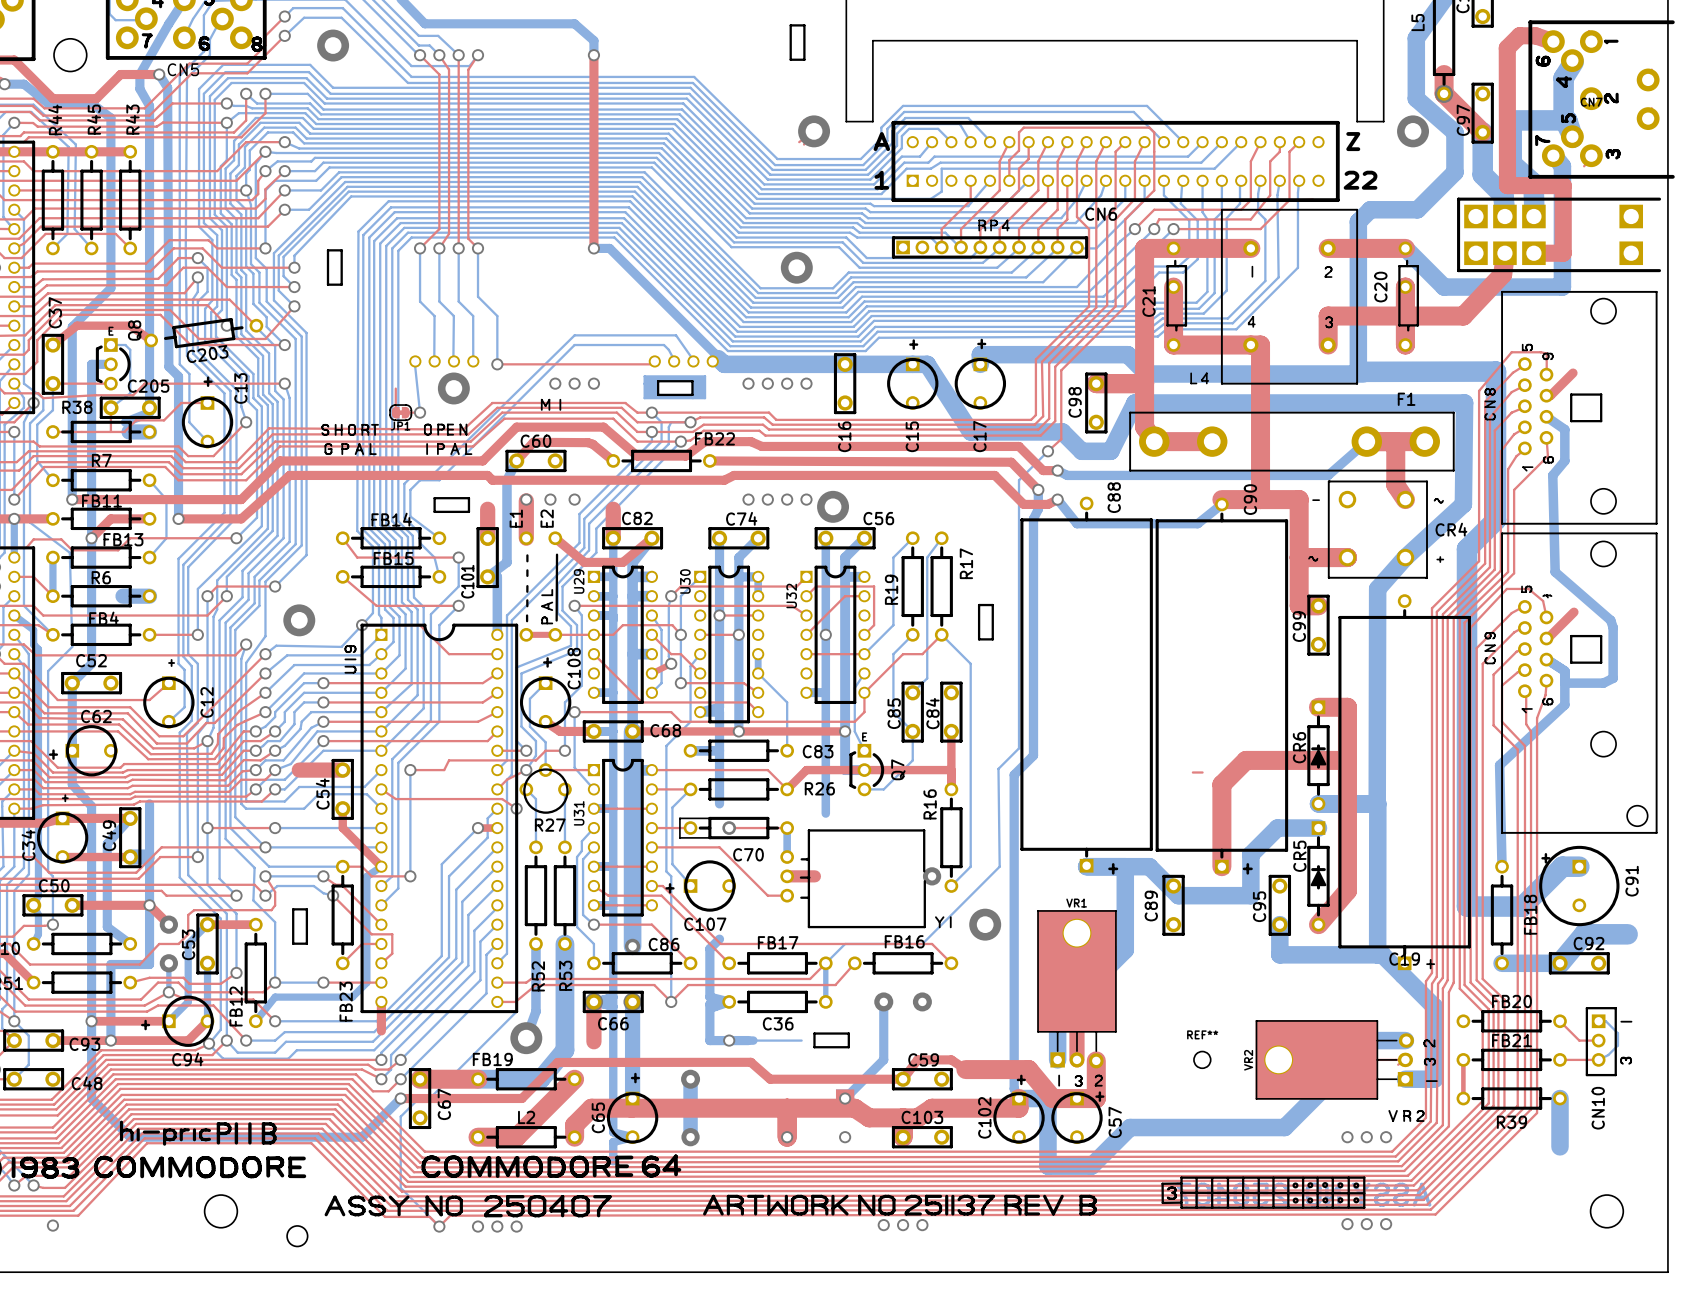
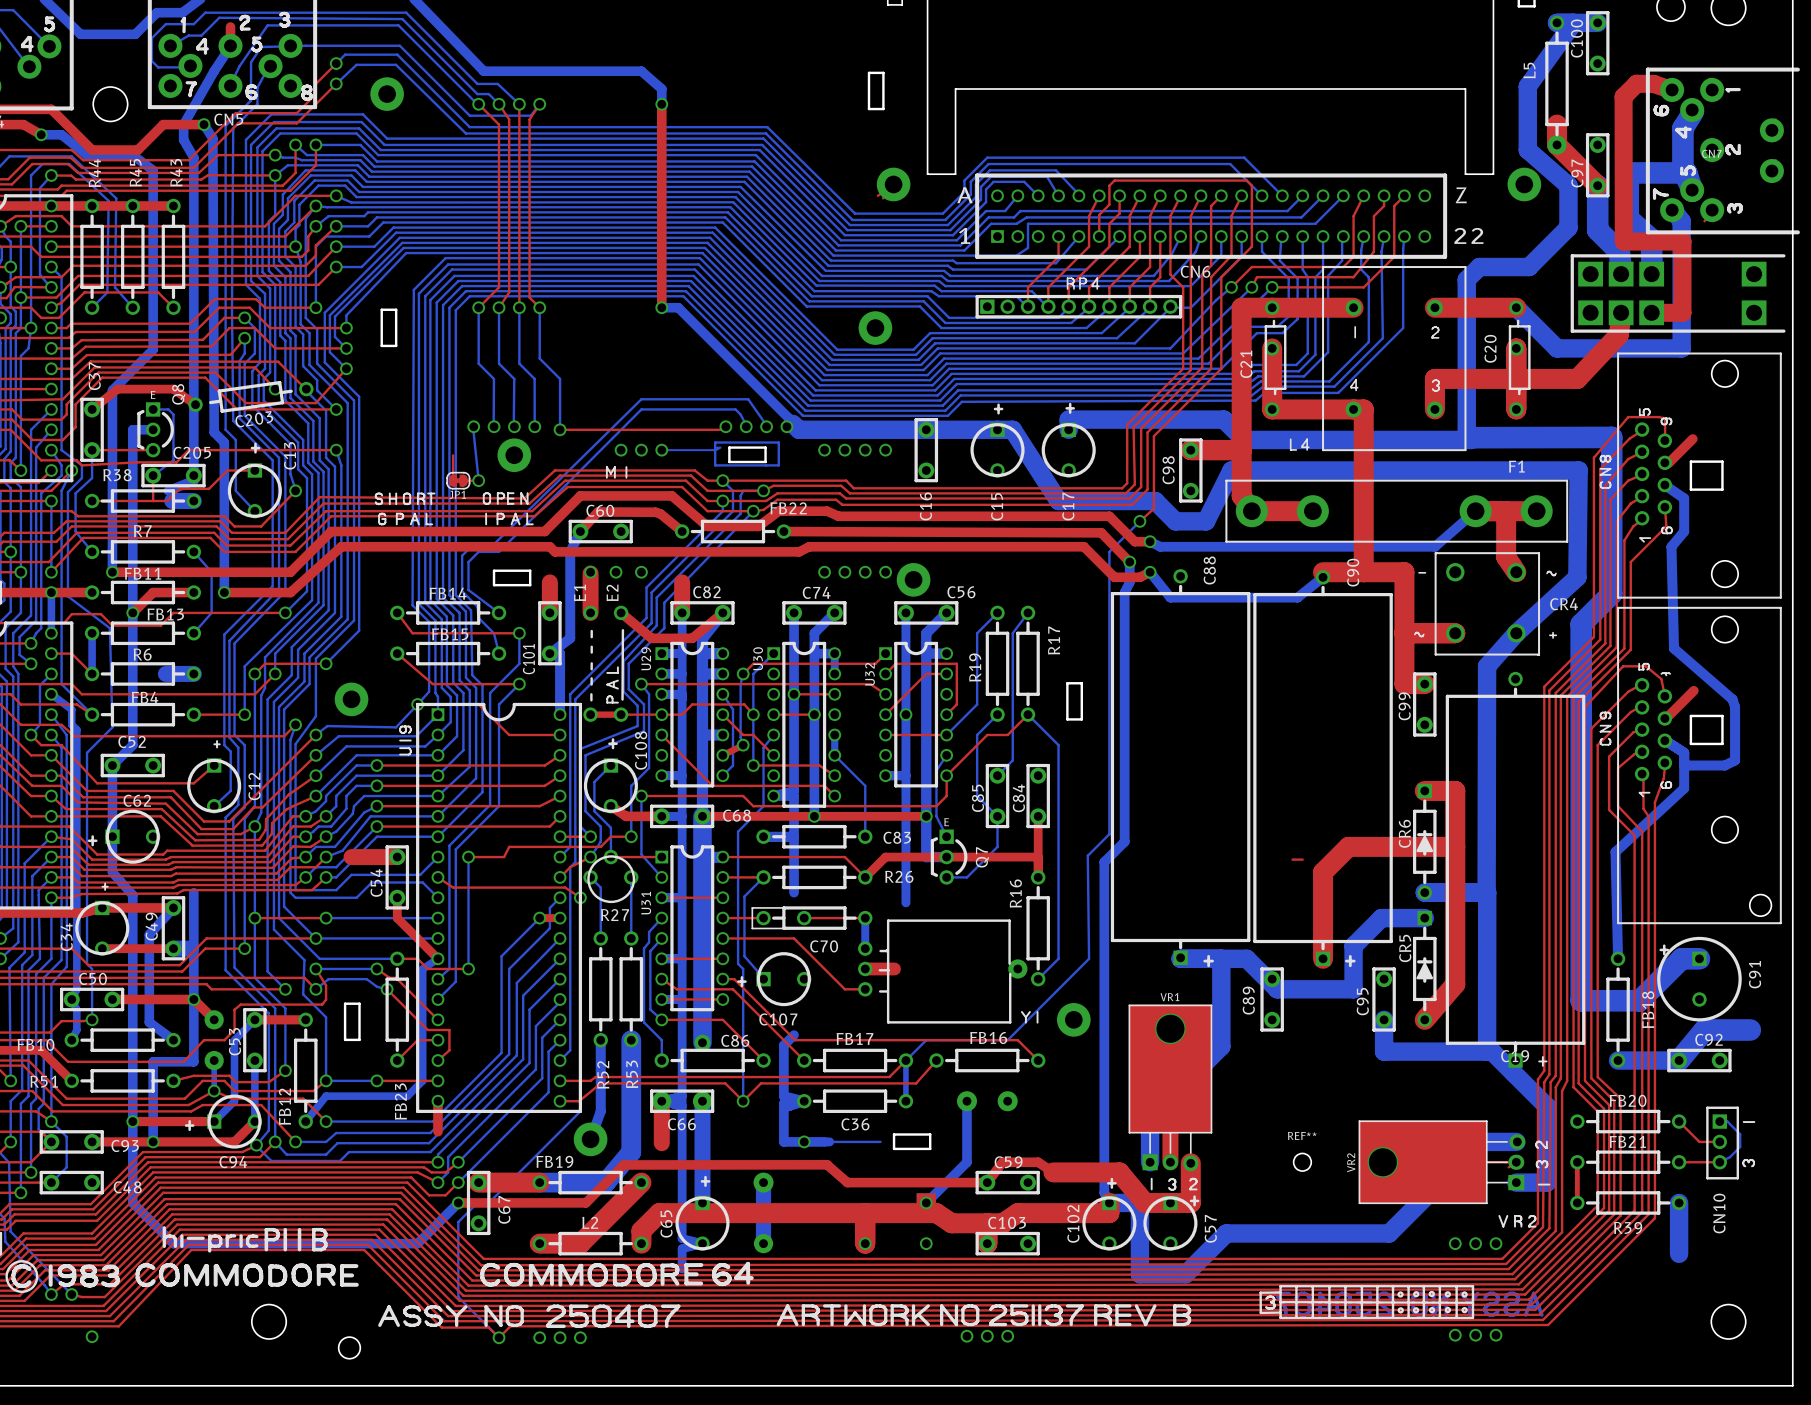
drawing: [644, 376, 706, 399] -> none
bottom track: none -> (661, 450) (715, 450)

